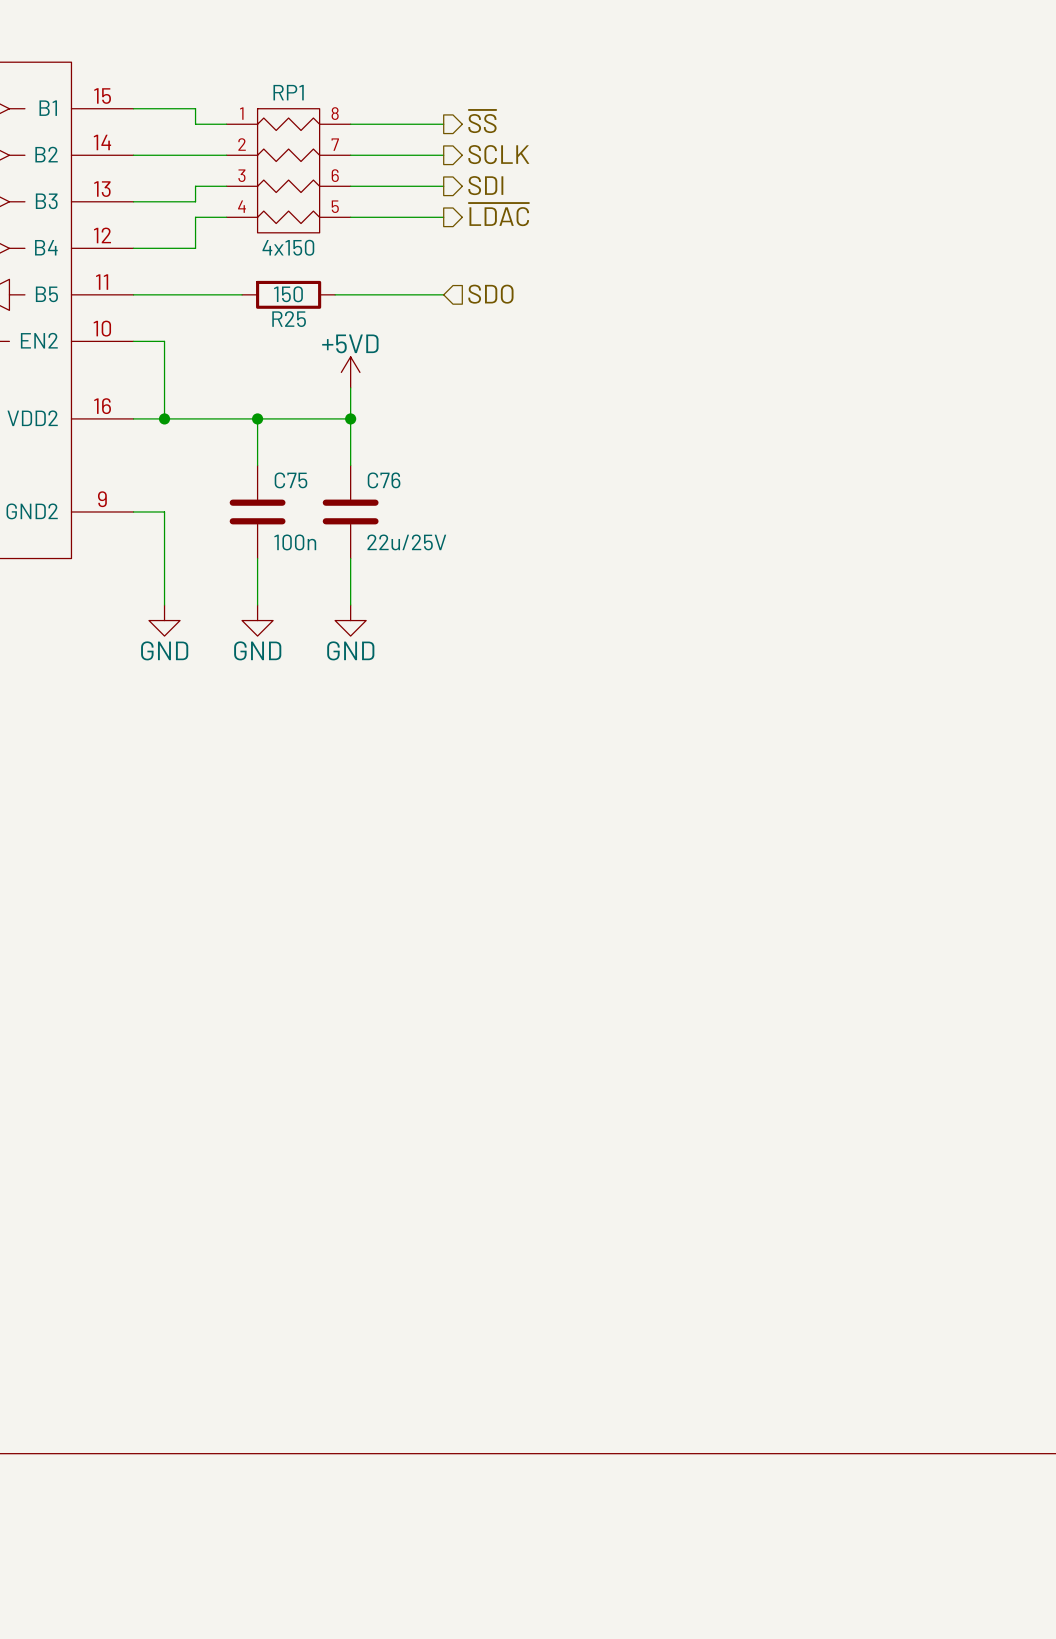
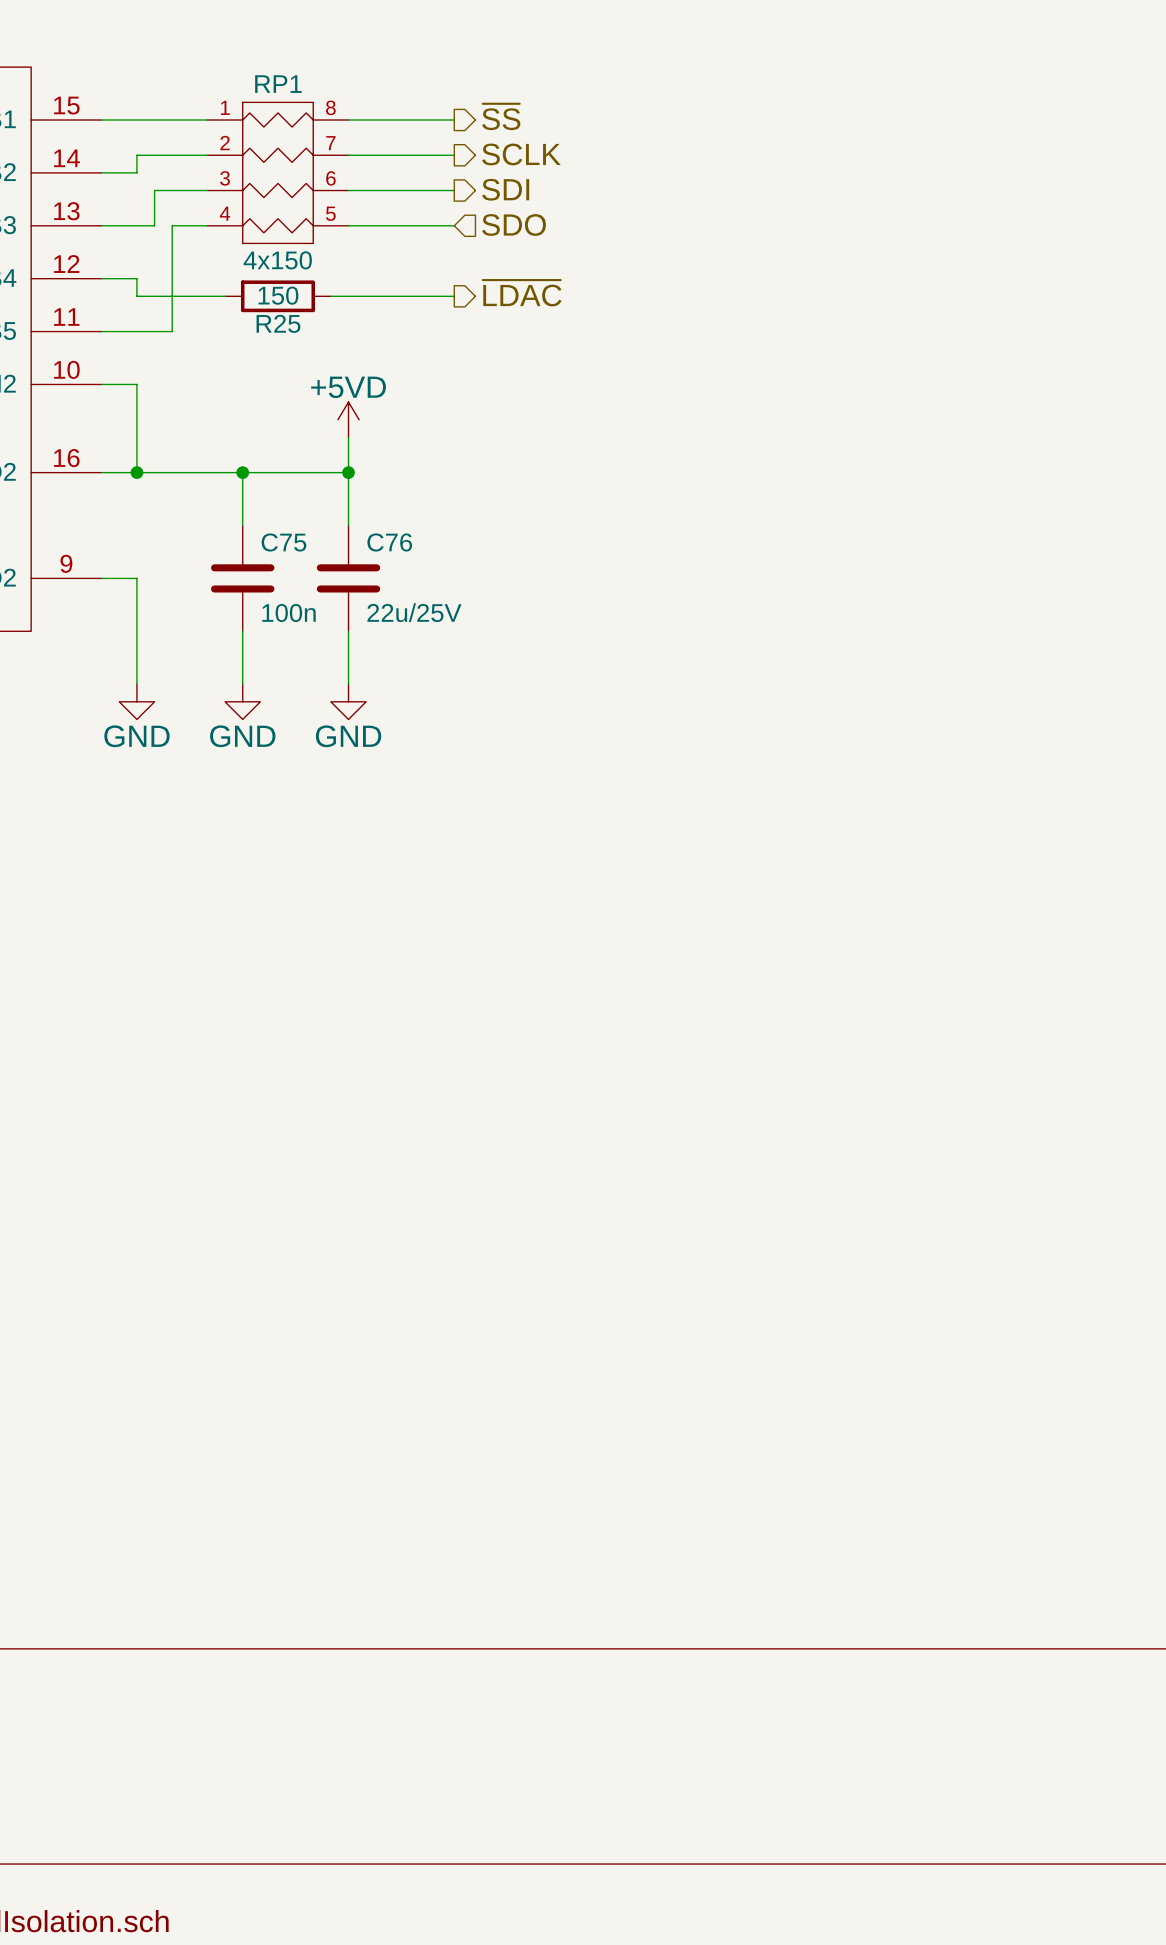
wire: (195, 108) (195, 124) (226, 124) -> (172, 120) (207, 120)
hierarchical label position: ~{SS} (482, 121) -> ~{SS} (501, 116)
wire: (350, 124) (443, 124) -> (348, 120) (454, 120)
hierarchical label position: SCLK (498, 154) -> SCLK (521, 154)
wire: (164, 155) (226, 155) -> (136, 172) (136, 155) (207, 155)
wire: (350, 155) (443, 155) -> (348, 155) (454, 155)
RP1 position: (288, 170) -> (277, 172)
hierarchical label position: SDI (485, 185) -> SDI (505, 189)
wire: (226, 186) (195, 186) (195, 201) (180, 201) -> (207, 190) (154, 190) (154, 225)
wire: (350, 186) (443, 186) -> (348, 190) (454, 190)
hierarchical label position: ~{LDAC} (498, 214) -> ~{LDAC} (522, 293)
wire: (195, 217) (226, 217) -> (172, 243) (172, 225) (207, 225)
wire: (350, 217) (443, 217) -> (348, 225) (454, 225)
wire: (164, 248) (195, 248) -> (136, 278) (136, 296) (225, 296)
wire: (195, 294) (242, 294) -> (172, 331) (172, 278)
R25 position: (288, 294) -> (277, 296)
wire: (335, 294) (443, 294) -> (330, 296) (454, 296)
hierarchical label position: SDO (490, 294) -> SDO (514, 224)

